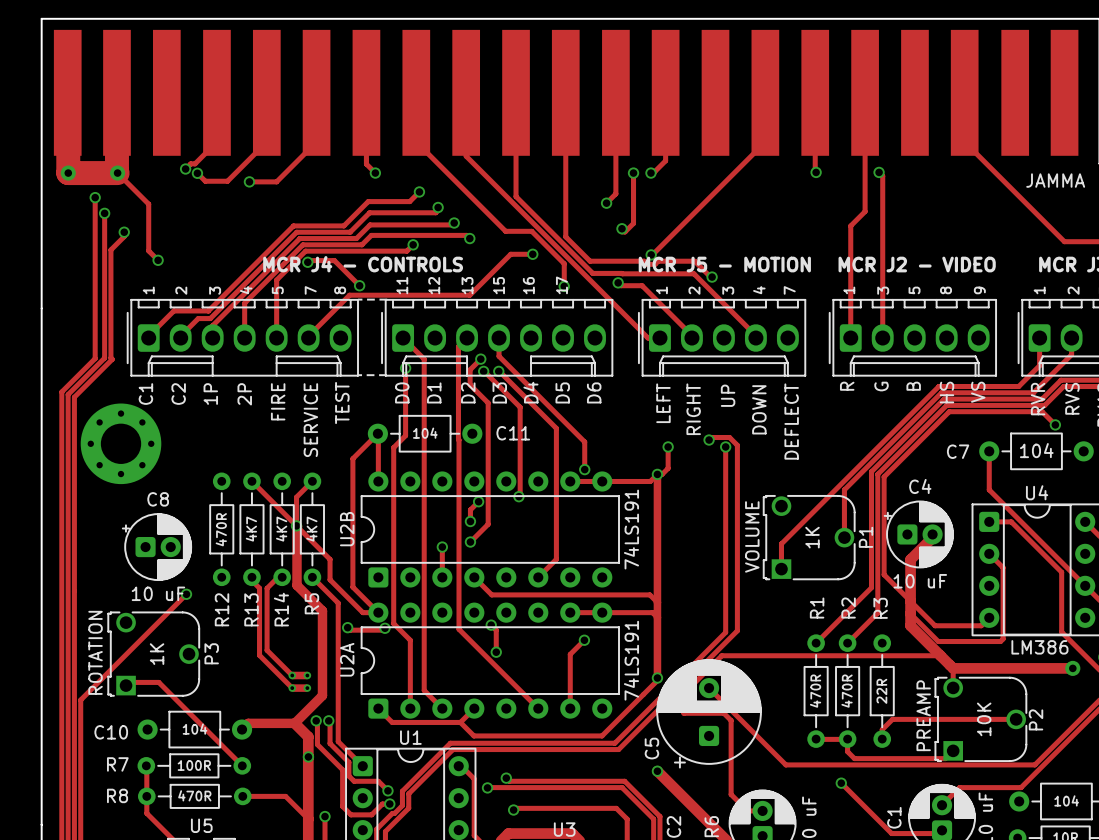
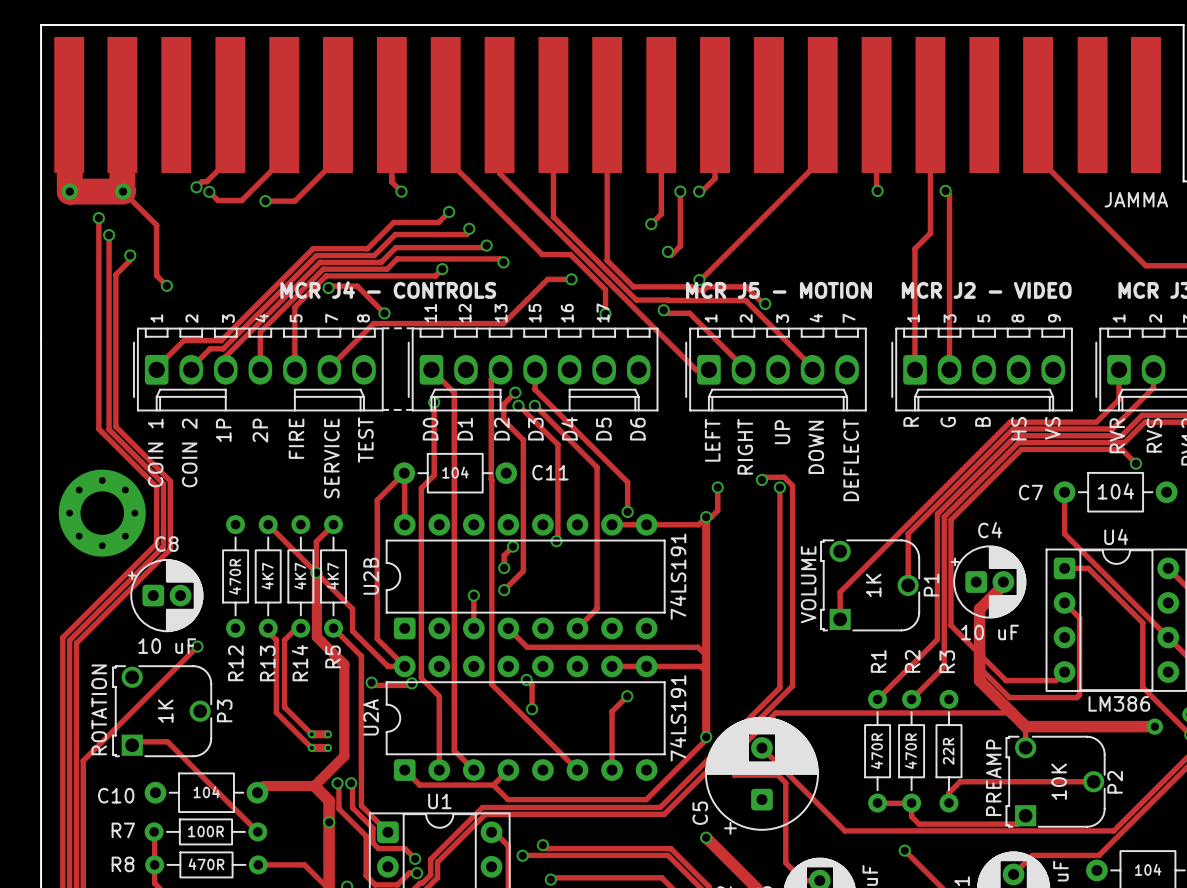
track: (110, 357) (112, 359) (74, 397) (74, 591) -> (115, 391) (115, 426) (170, 481) (170, 549) (76, 643)
track: (95, 358) (61, 392) (61, 585) -> (98, 392) (98, 428) (156, 486) (156, 543) (62, 637)
track: (104, 358) (68, 394) (68, 588) -> (109, 391) (109, 429) (163, 483) (163, 546) (69, 640)
text: C1 (145, 394) -> none
text: C2 (178, 394) -> none
text: none -> COIN 1 (155, 452)
text: none -> COIN 2 (189, 452)
part position: (121, 443) -> (102, 513)

